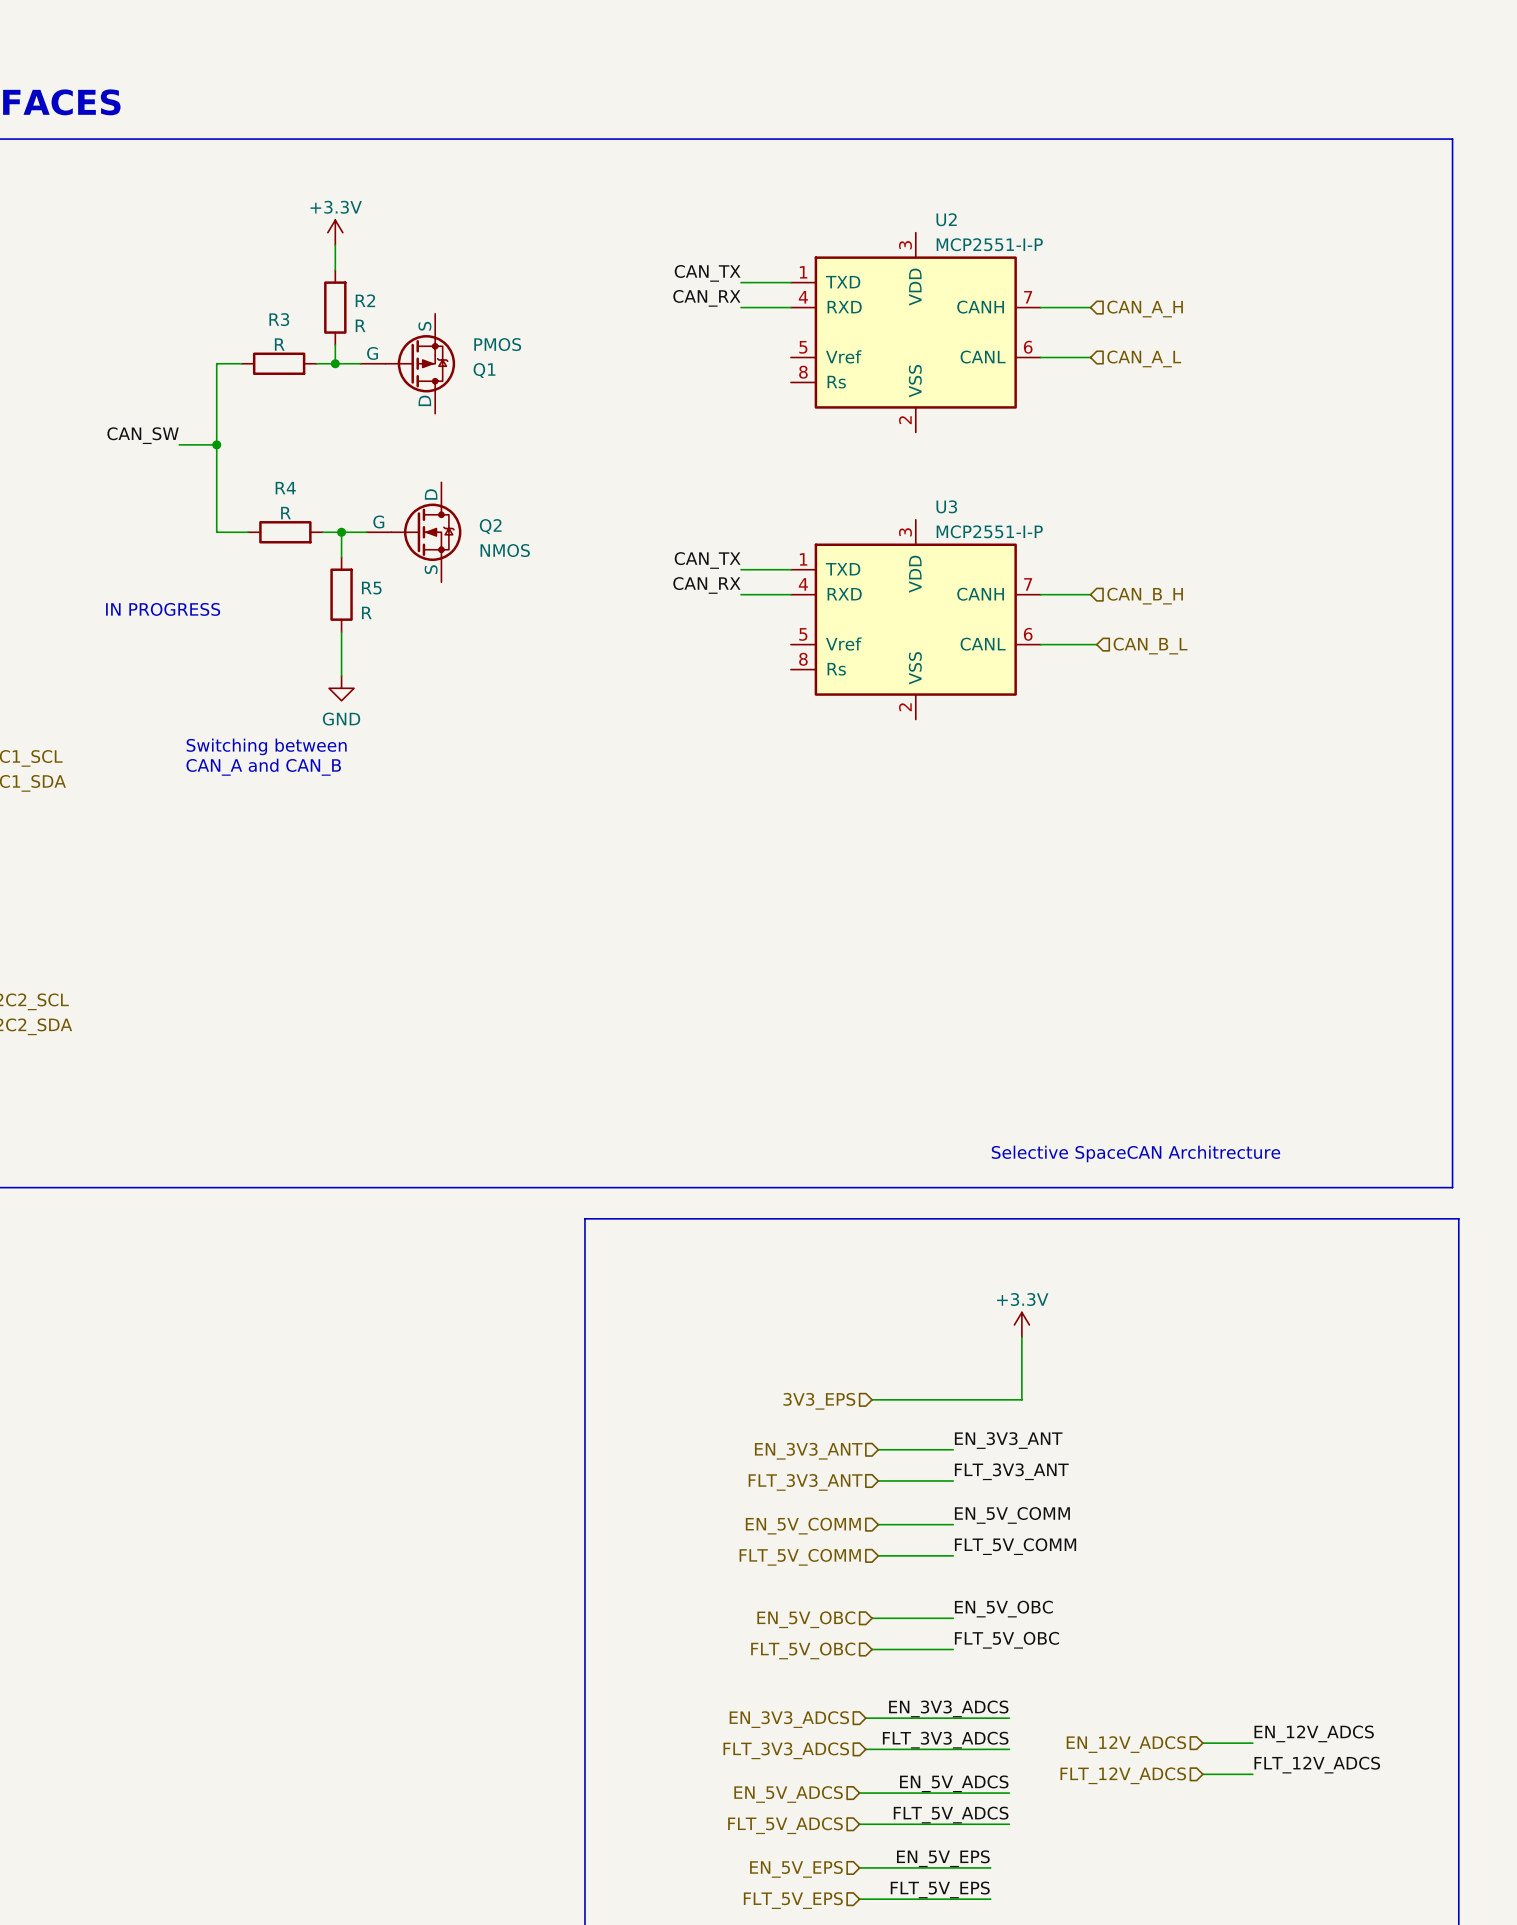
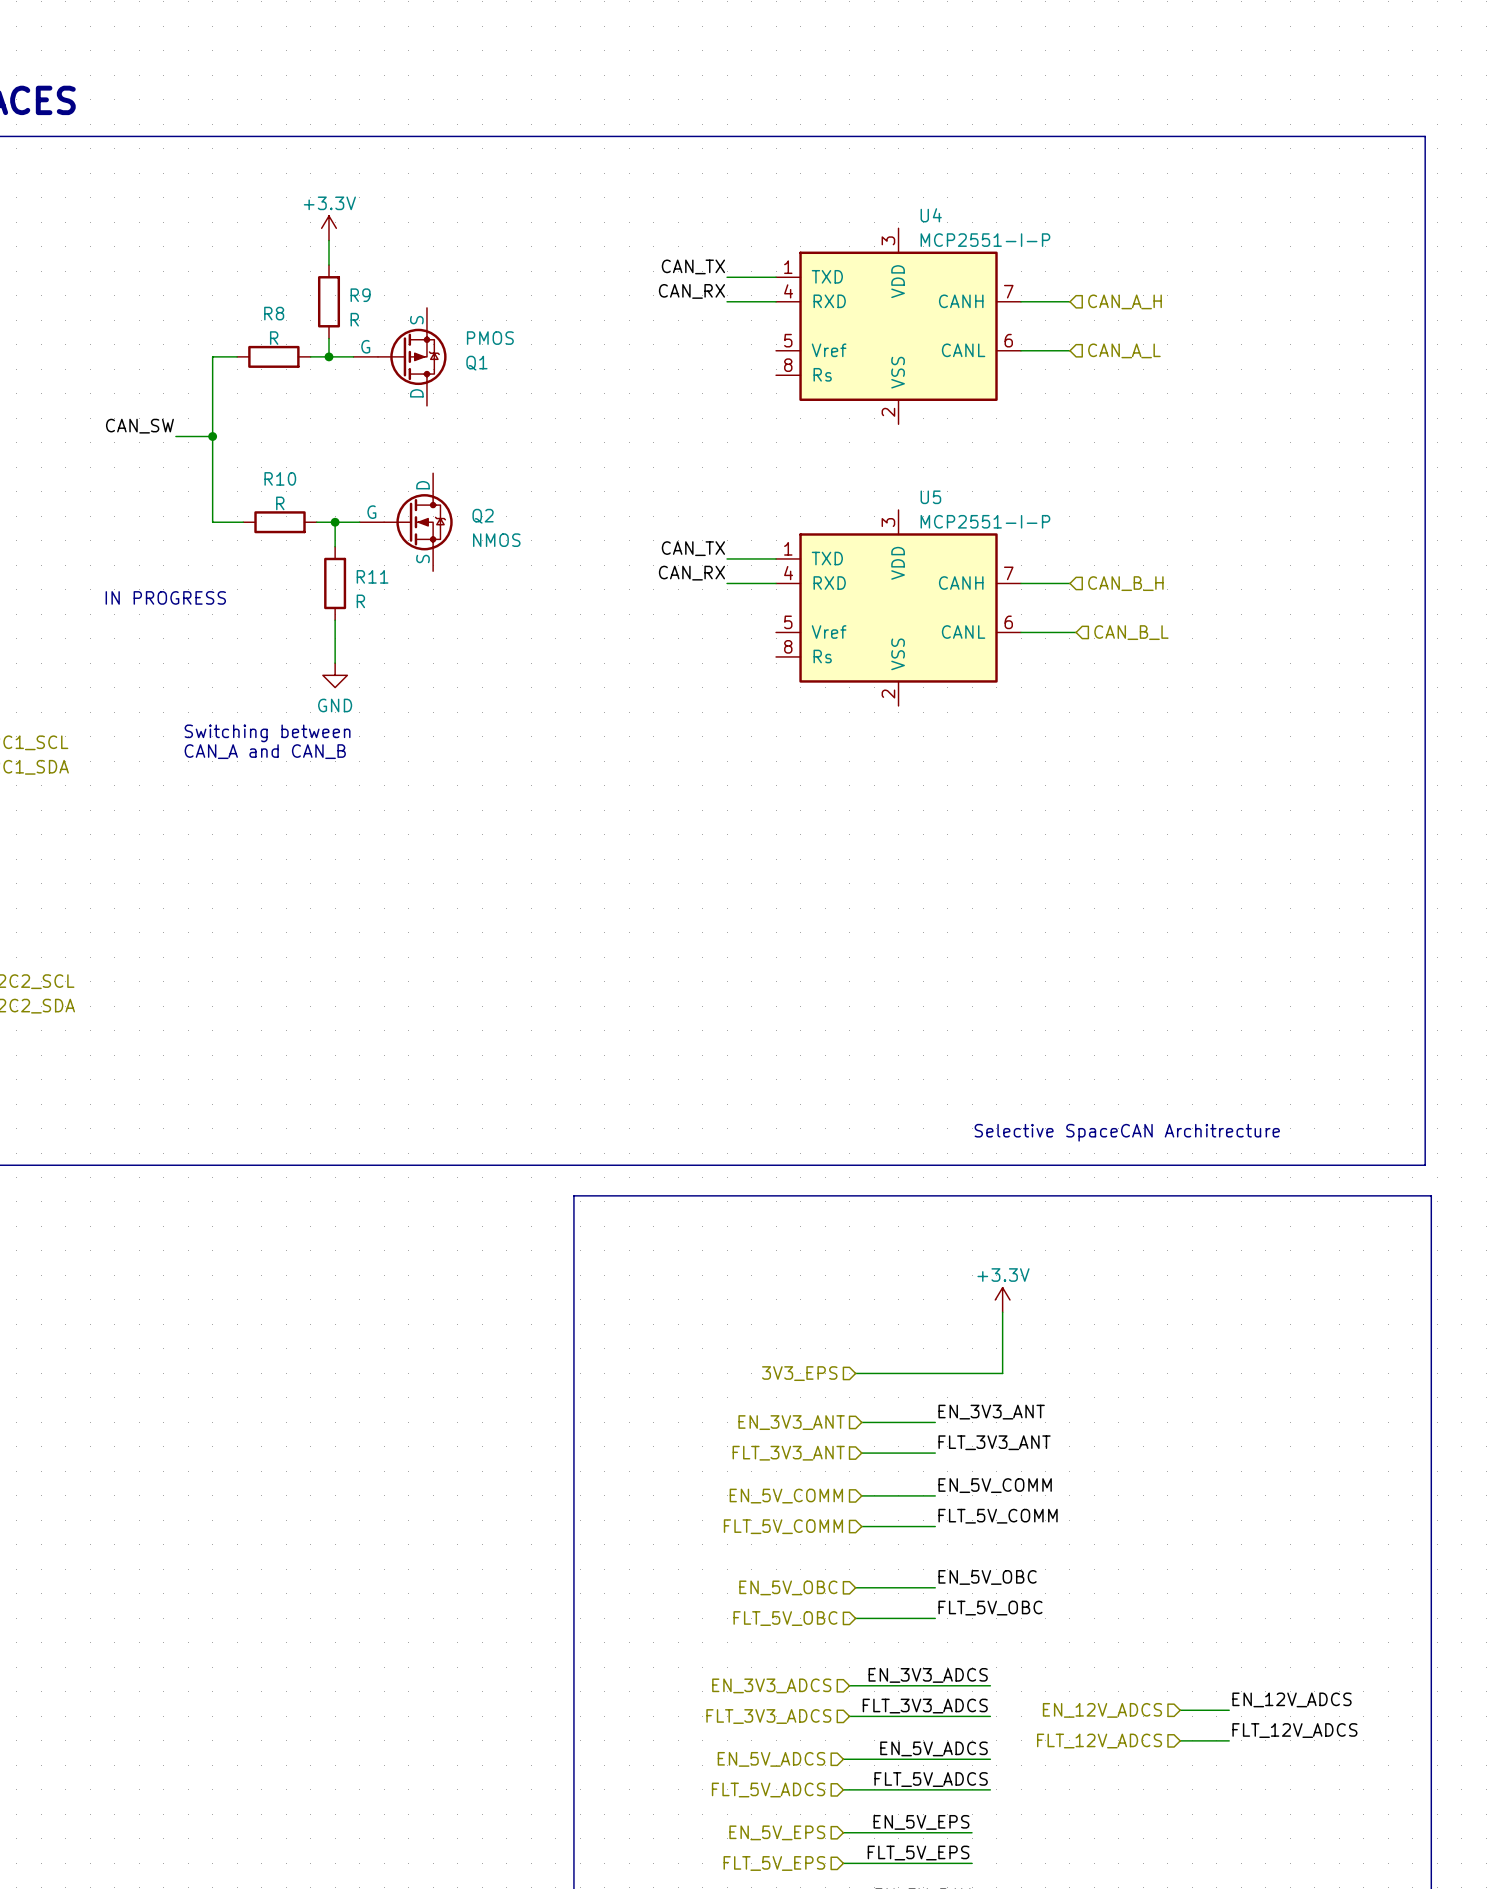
U2 name: U2 (946, 219) -> U4 (931, 215)
R2 name: R2 (365, 300) -> R9 (360, 295)
R3 name: R3 (279, 319) -> R8 (274, 313)
R4 name: R4 (285, 488) -> R10 (280, 478)
U3 name: U3 (946, 506) -> U5 (930, 497)
R5 name: R5 (371, 588) -> R11 (372, 576)

